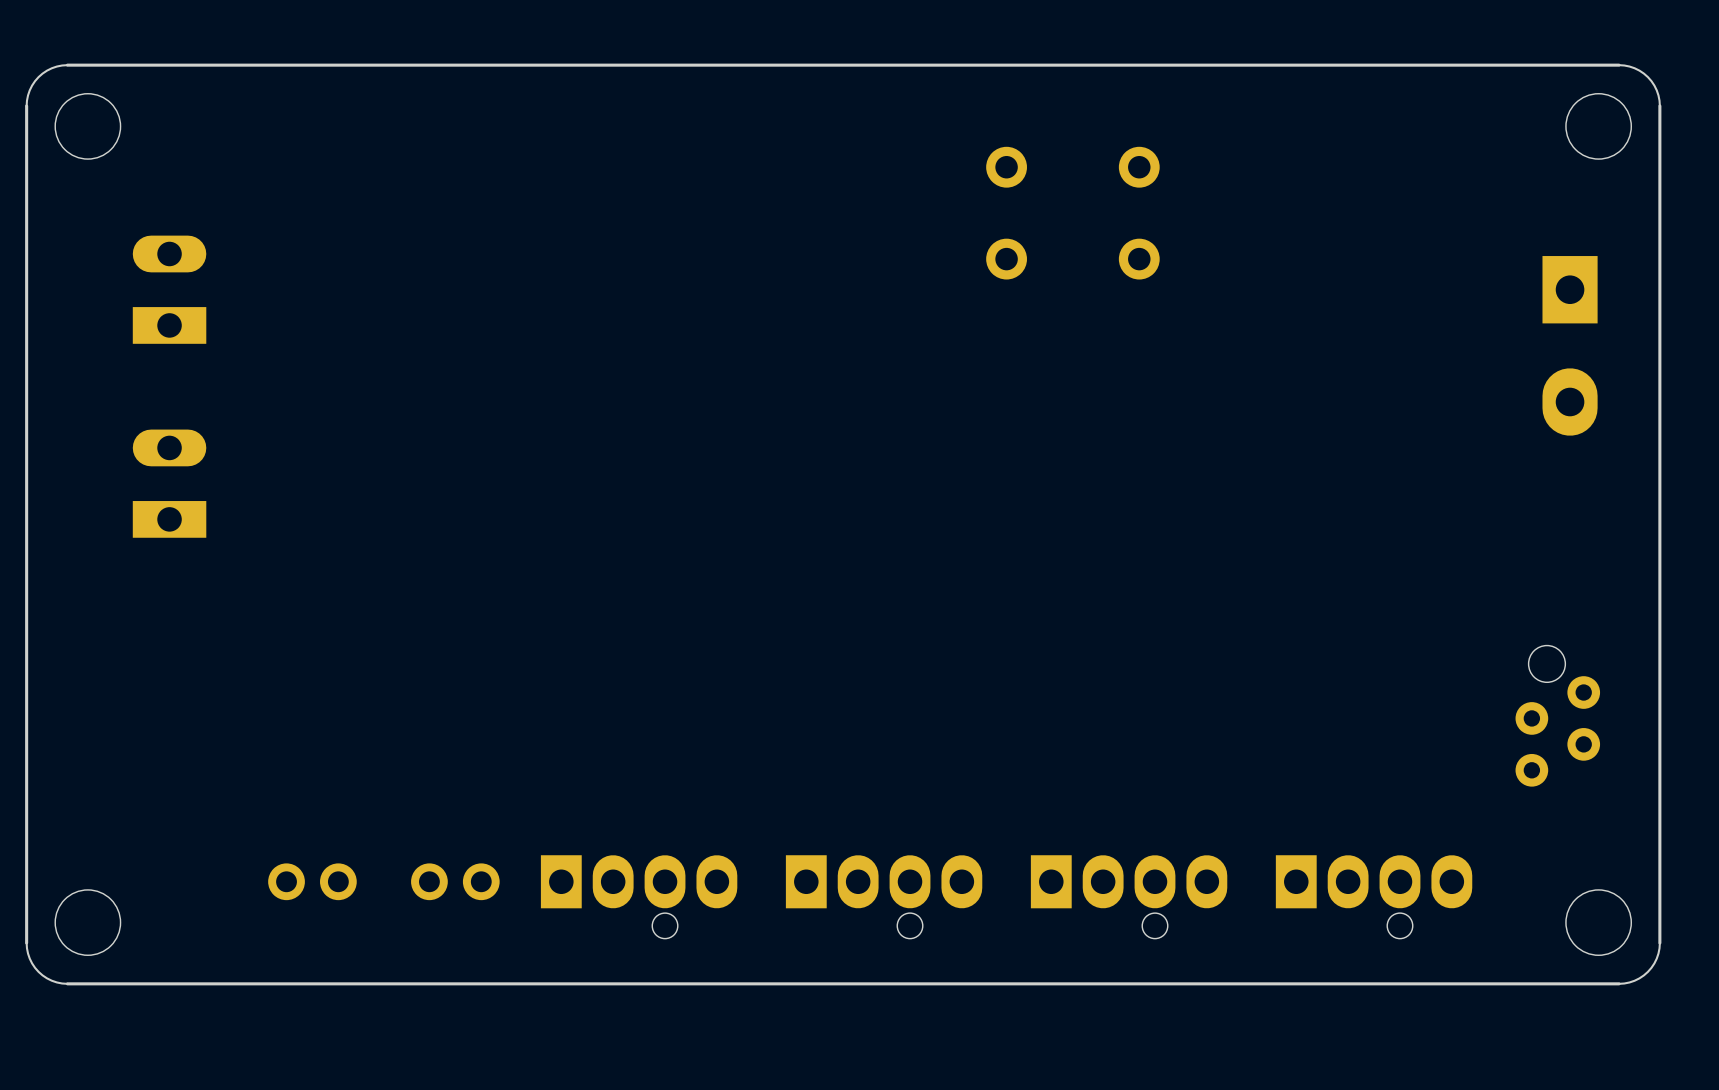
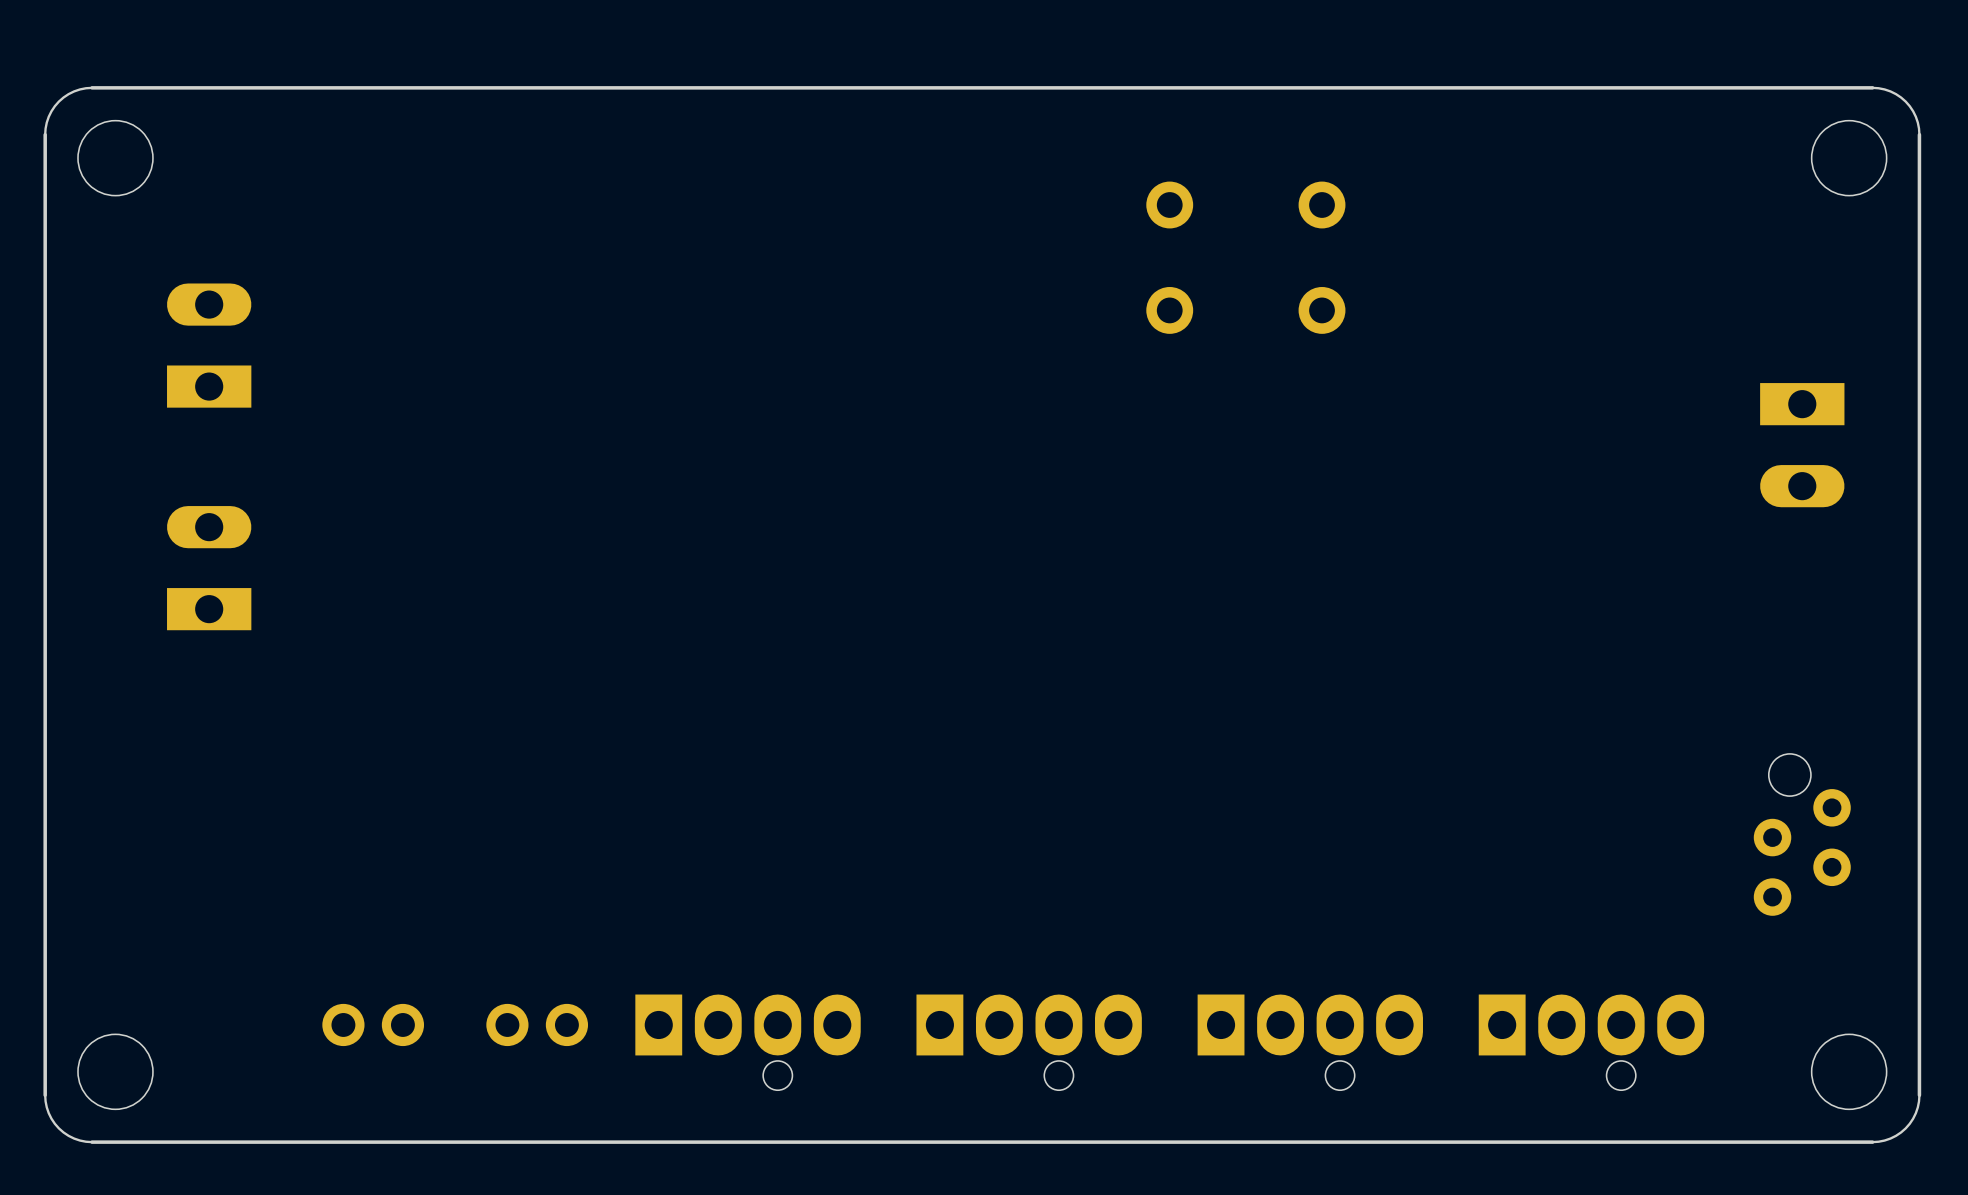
part: (1570, 345) -> none
part: none -> (1802, 445)

